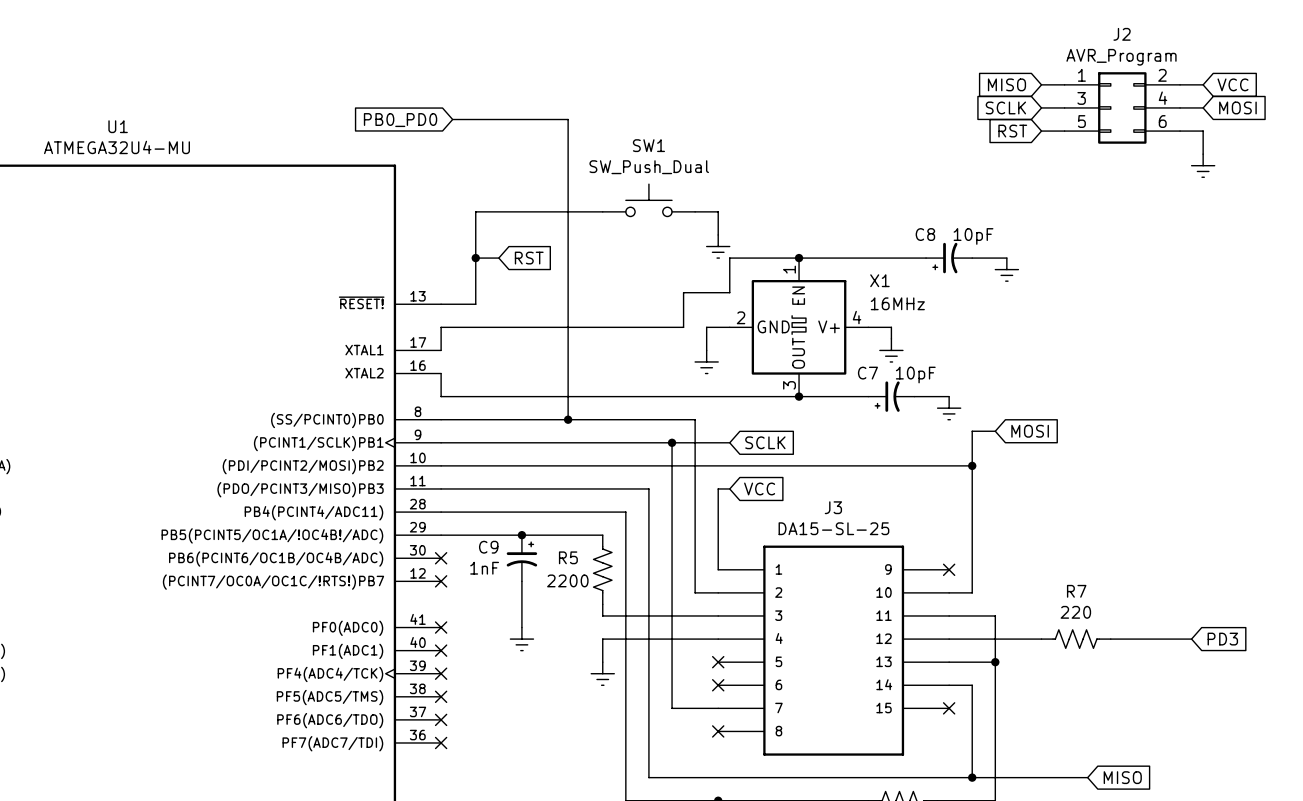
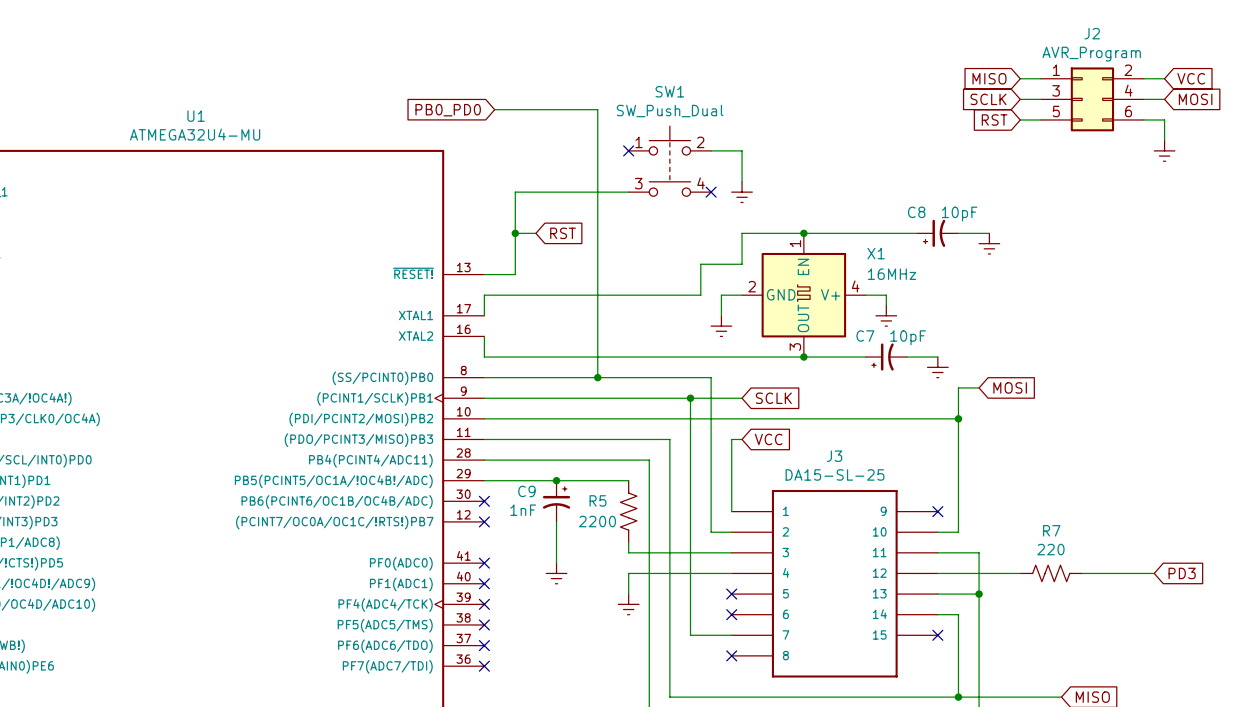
SW1 name position: SW1 (648, 145) -> SW1 (669, 91)
no-connect mark: none -> (628, 150)
wire: none -> (711, 150) (742, 150) (742, 181)
SW1 value position: SW_Push_Dual (649, 167) -> SW_Push_Dual (670, 111)
SW1 symbol: [602, 184, 696, 217] -> [628, 126, 712, 197]
wire: (695, 211) (718, 211) (718, 234) -> none
no-connect mark: none -> (711, 192)
power symbol position: (718, 246) -> (742, 192)

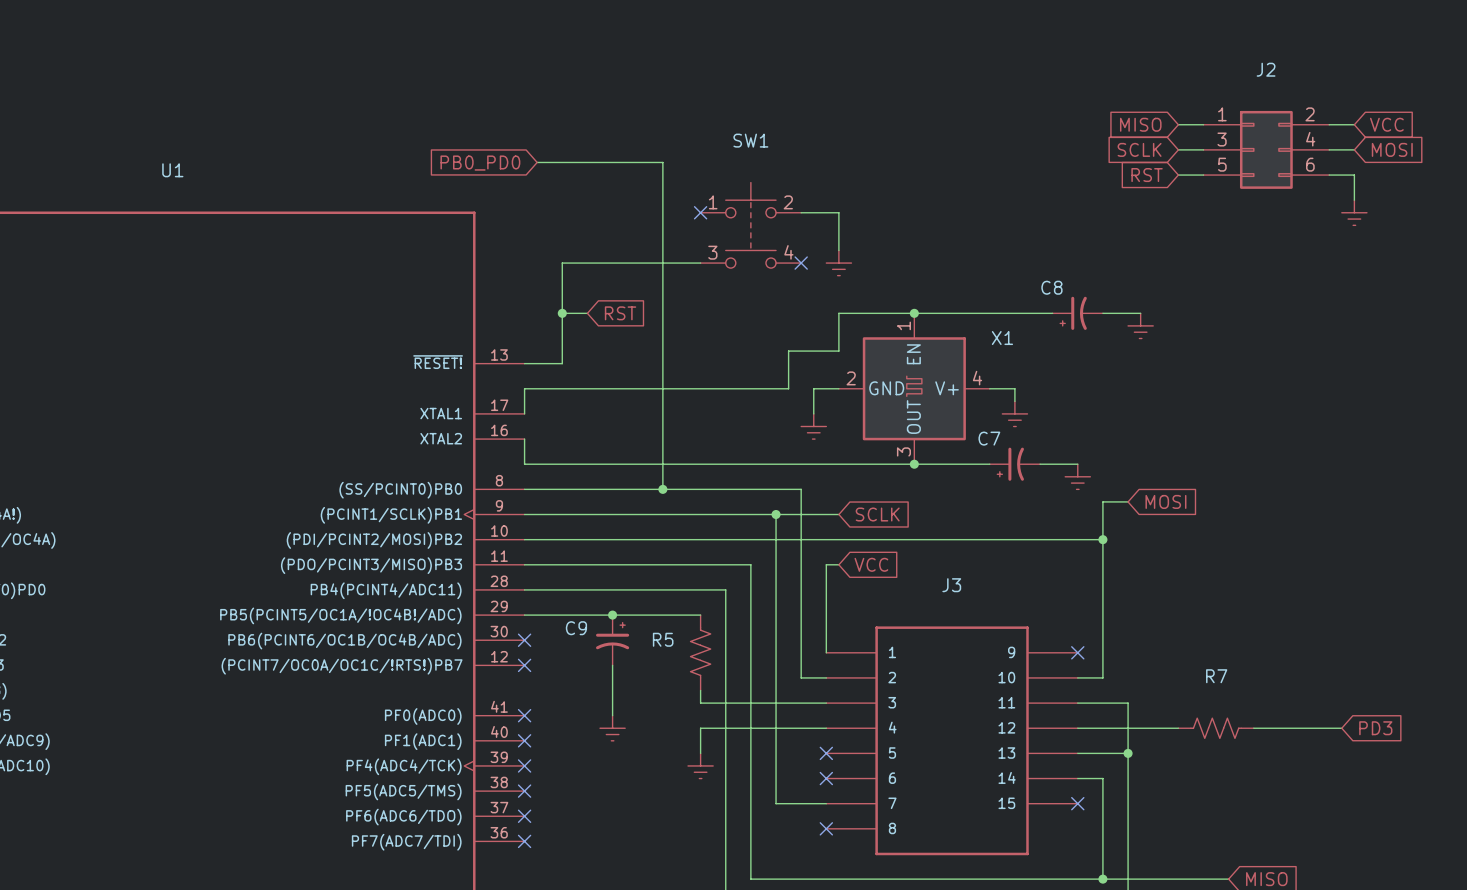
J2 value: AVR_Program (1091, 54) -> none
SW1 value: SW_Push_Dual (670, 111) -> none
U1 value: ATMEGA32U4-MU (195, 134) -> none
C8 value: 10pF (959, 214) -> none
X1 value: 16MHz (892, 274) -> none
C7 value: 10pF (908, 337) -> none
J3 value: DA15-SL-25 (835, 474) -> none
C9 value: 1nF (523, 510) -> none
R5 value: 2200 (597, 521) -> none
R7 value: 220 (1050, 549) -> none

